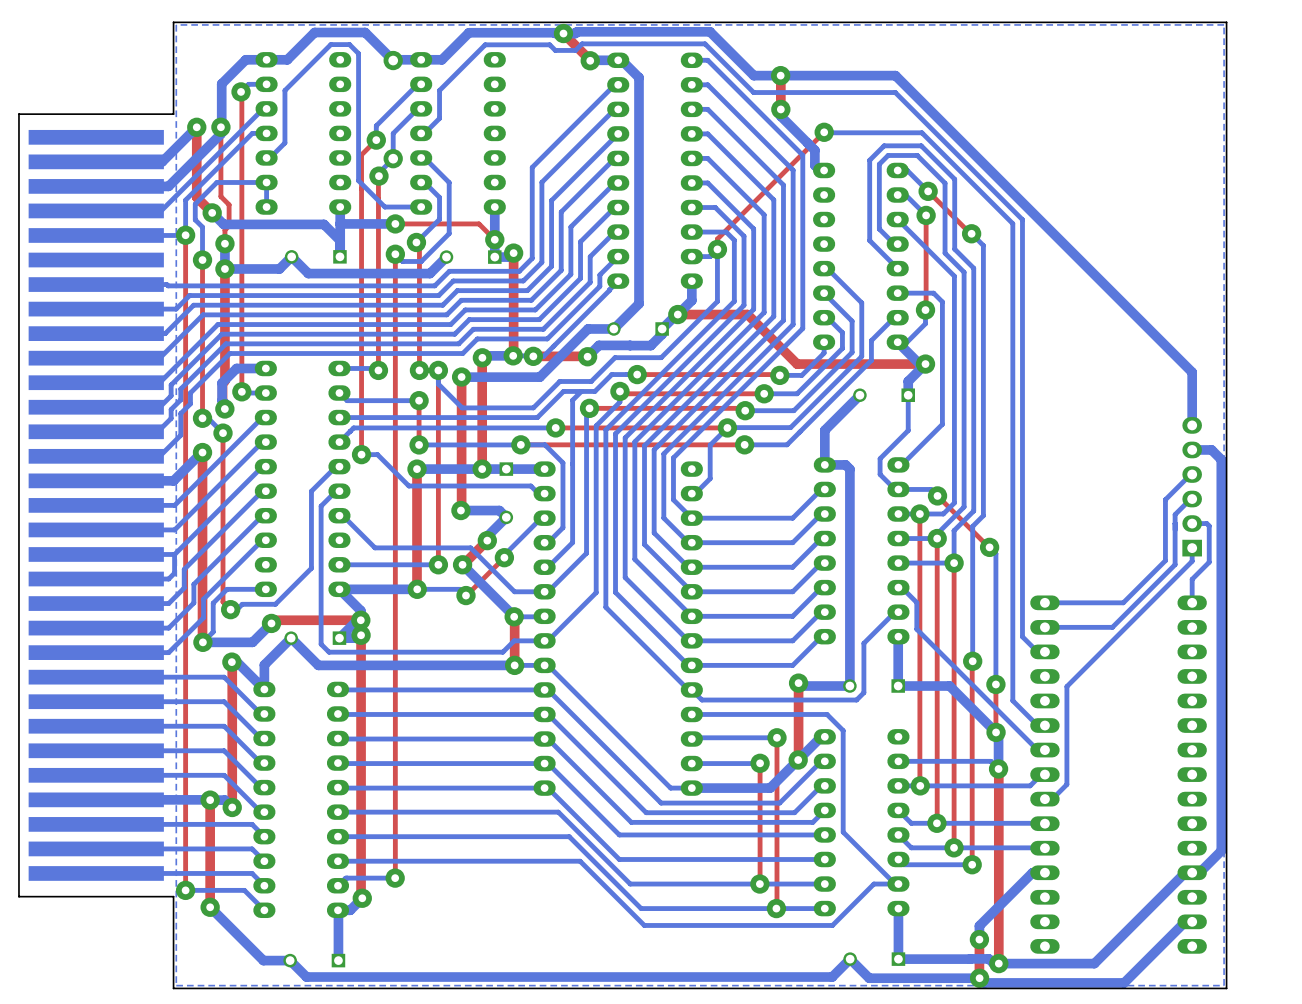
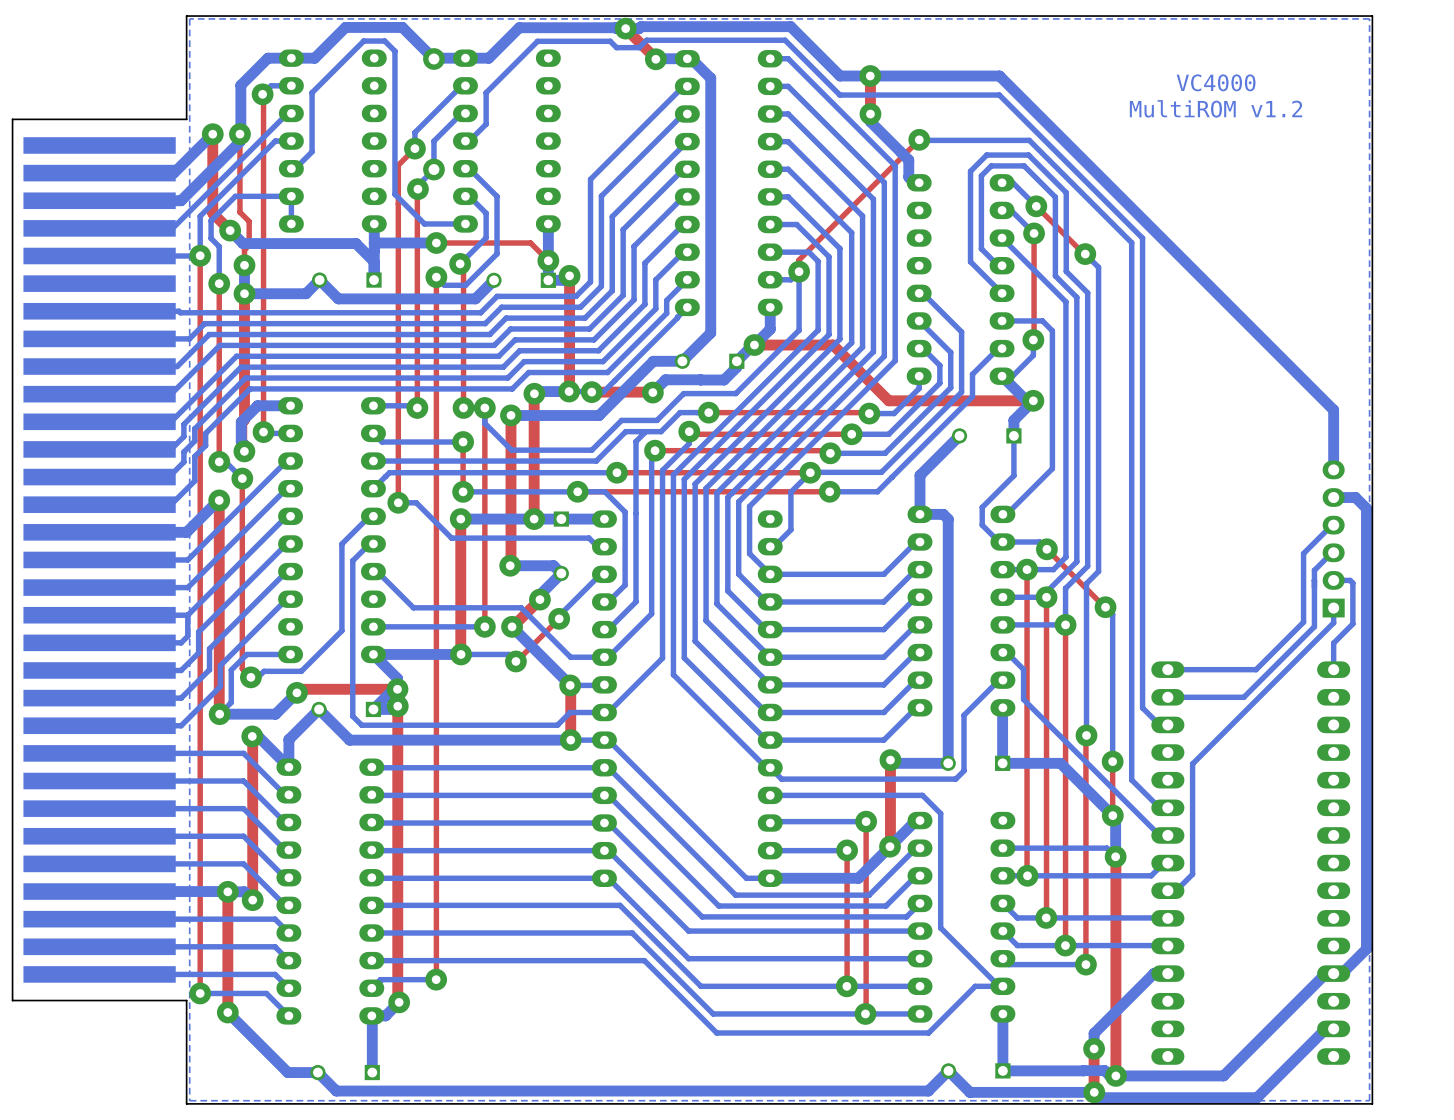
text: none -> VC4000 (1216, 82)
text: none -> MultiROM v1.2 (1216, 108)

